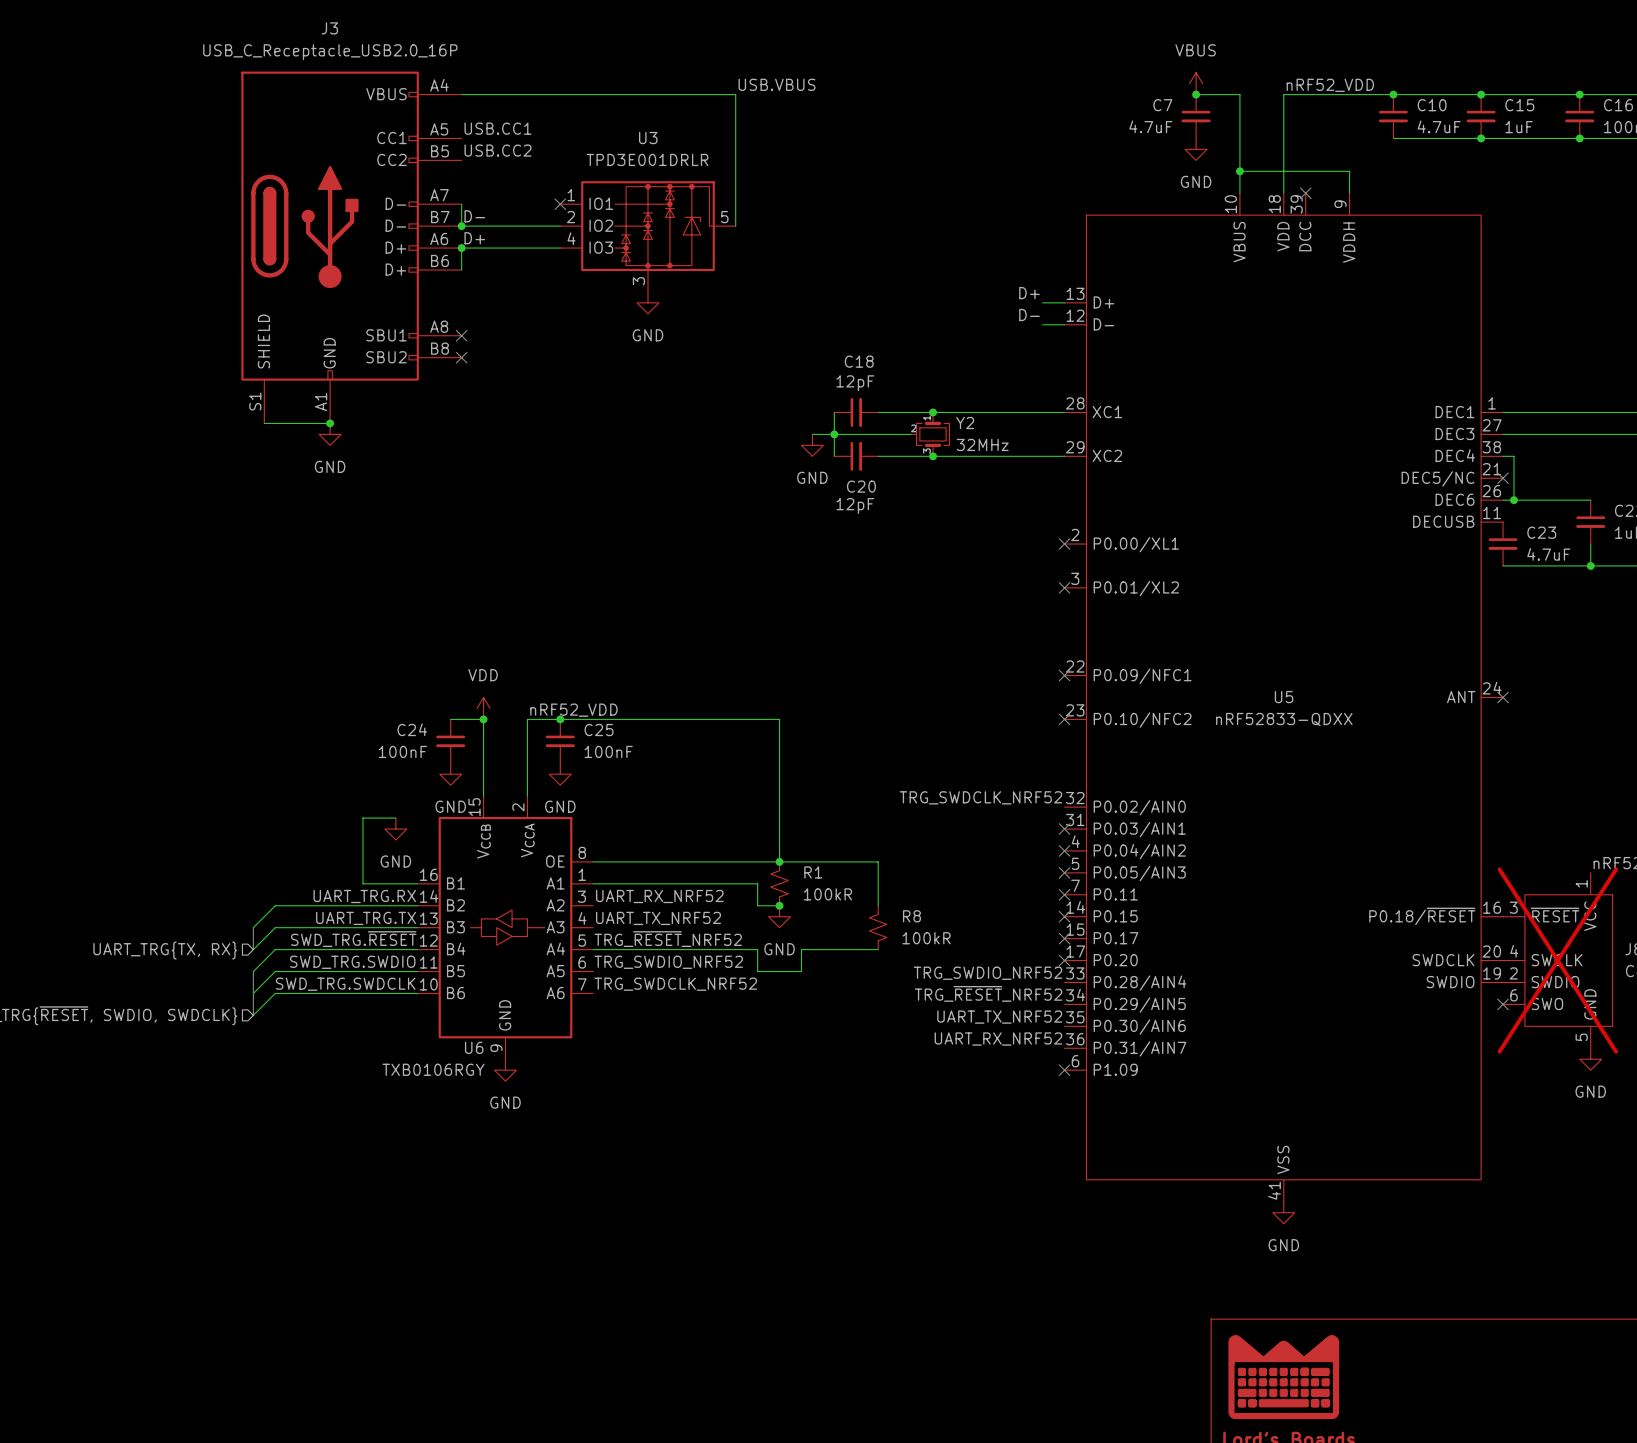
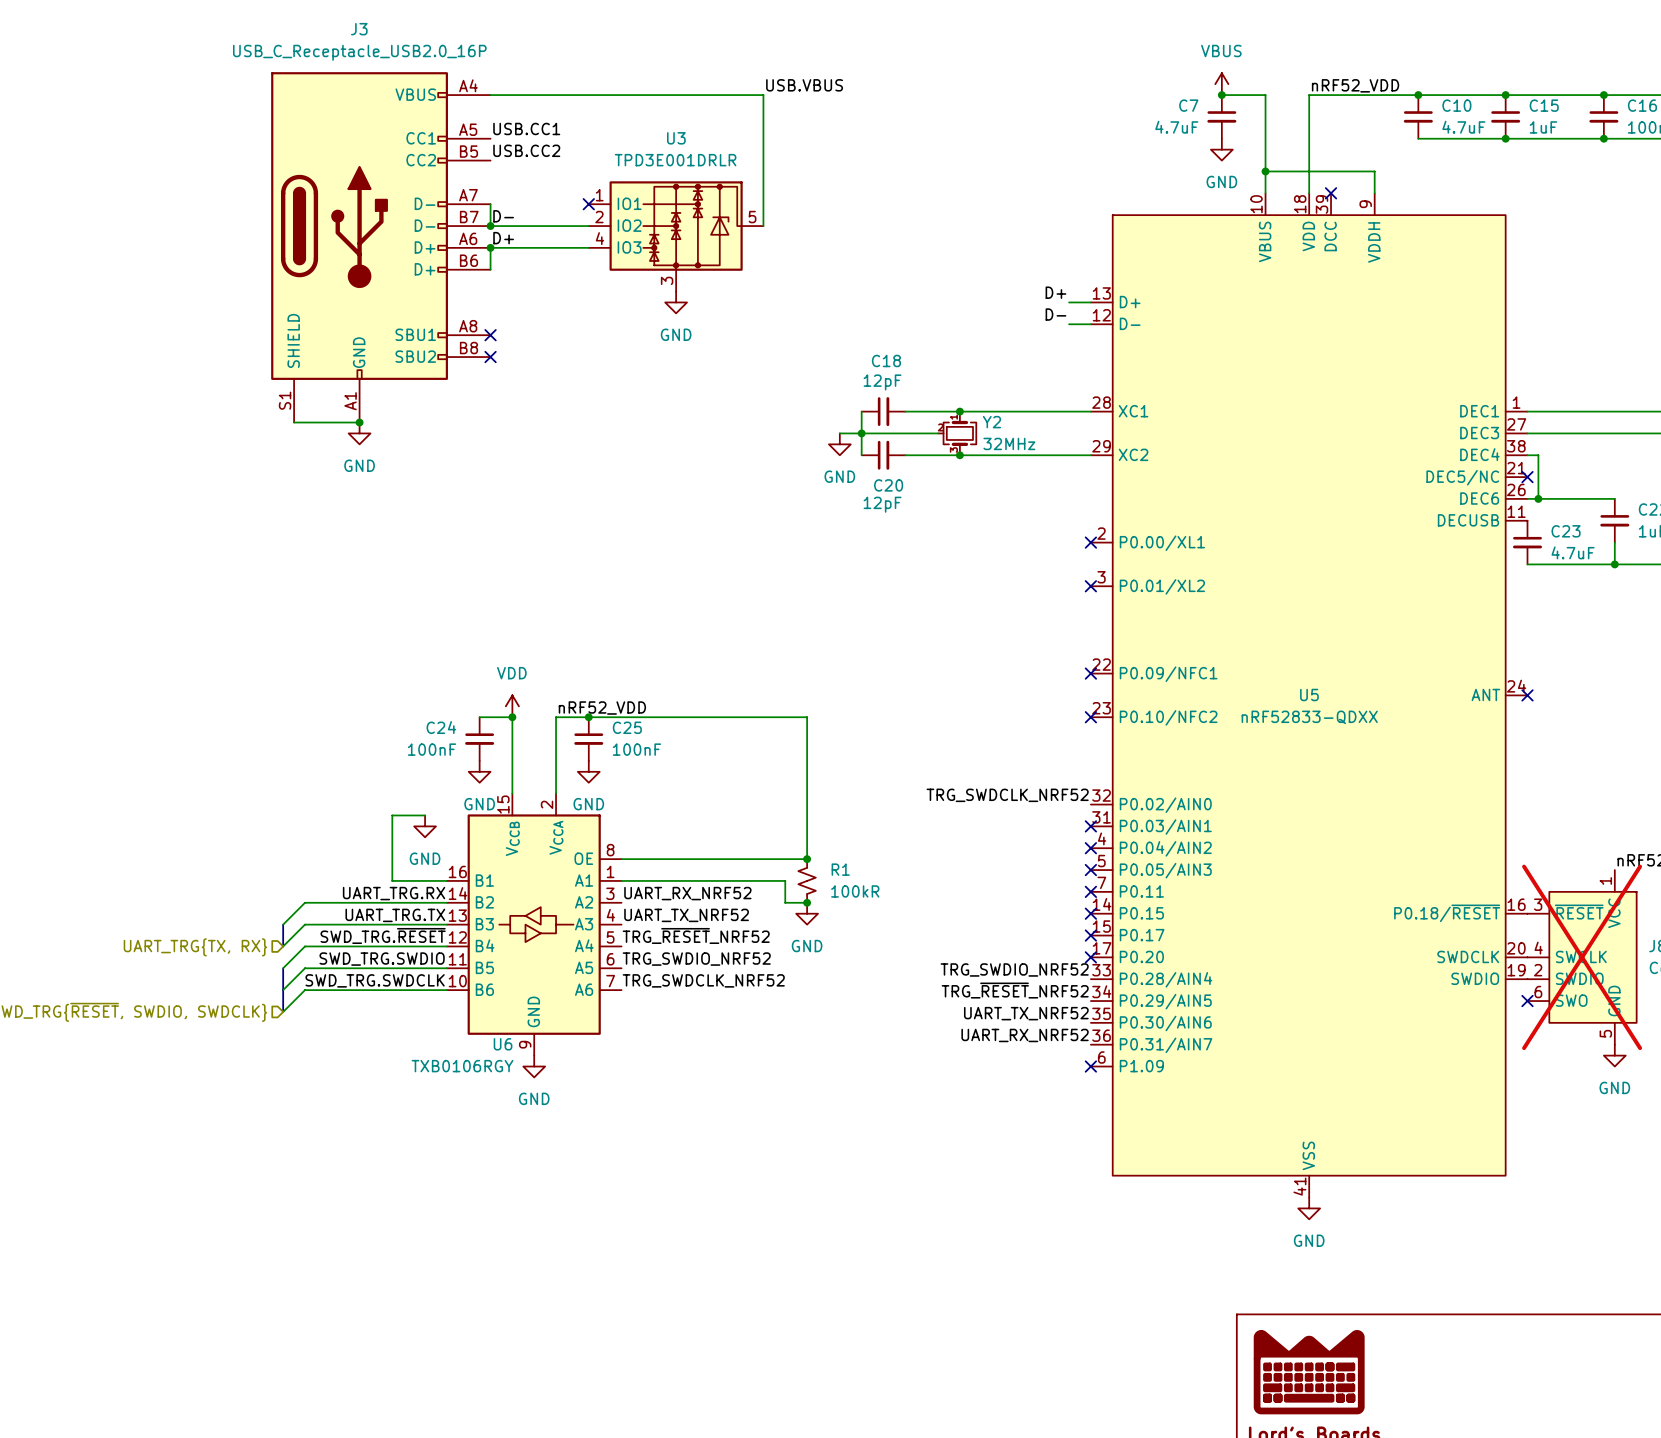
wire: (779, 861) (878, 861) (878, 905) -> none
R8: 100kR (878, 927) -> none
wire: (593, 949) (757, 949) (757, 971) (801, 971) (801, 949) (878, 949) -> none

